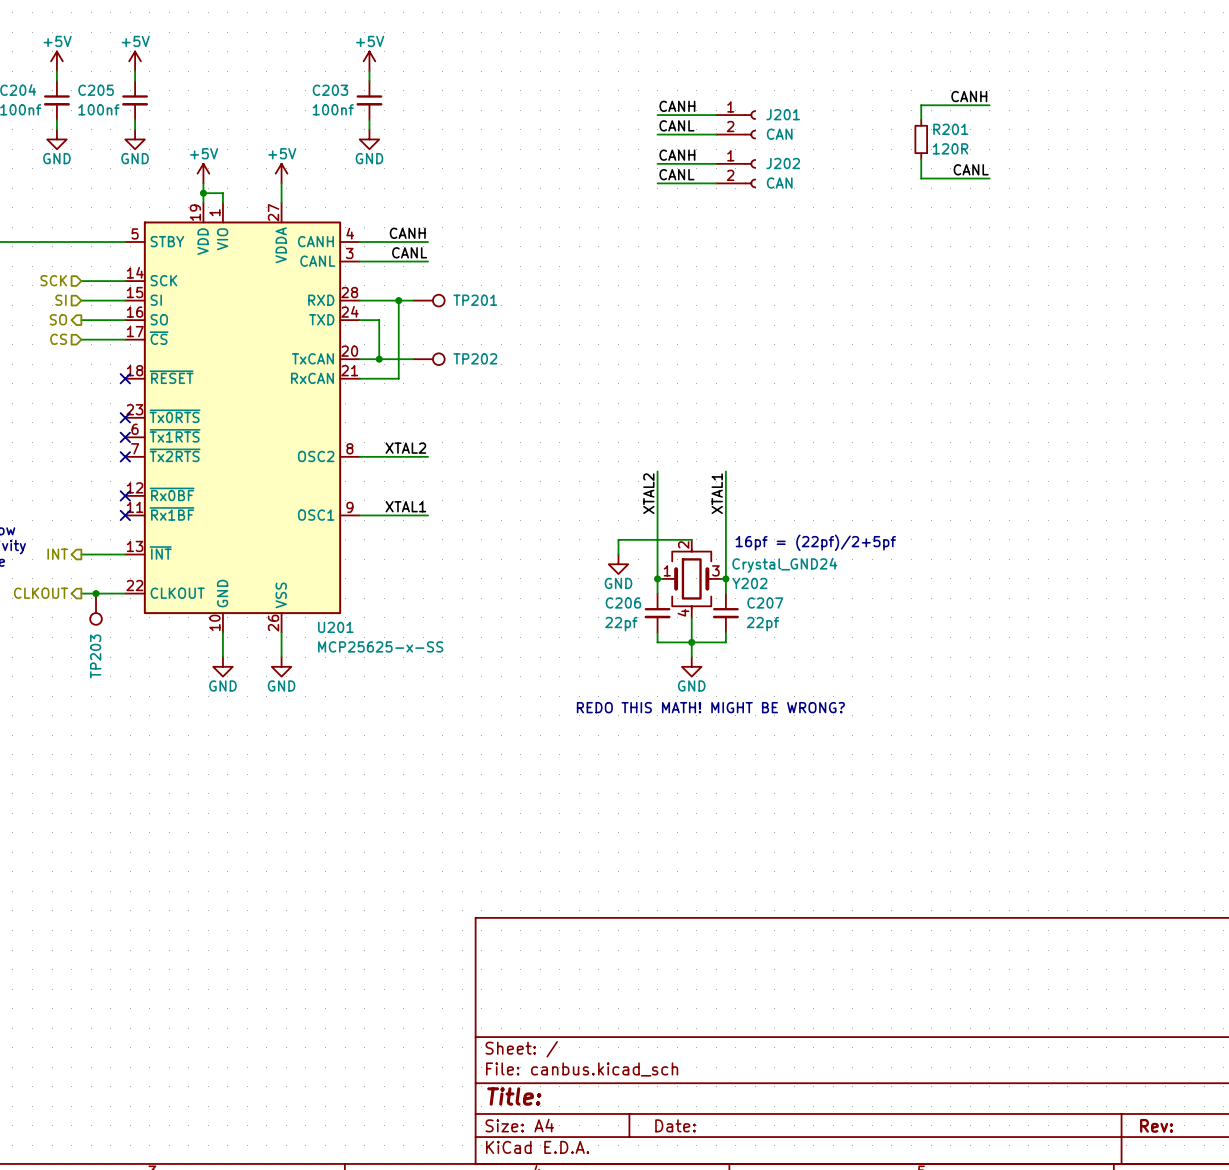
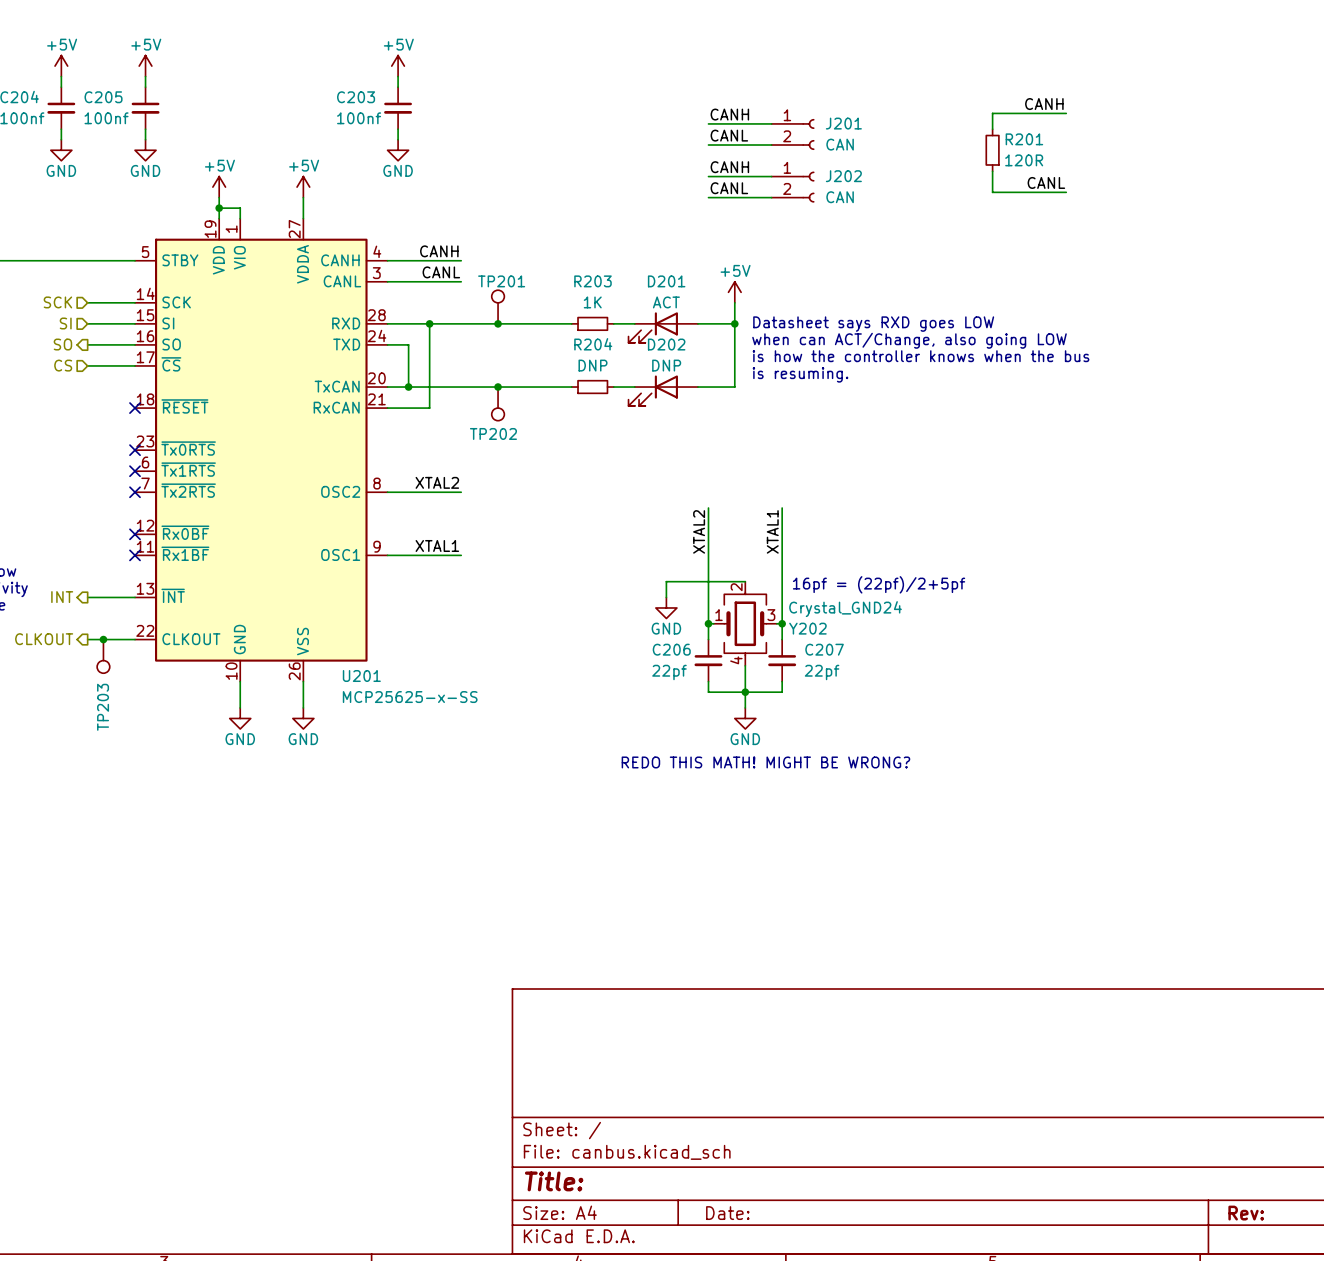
power symbol: none -> +5V (734, 292)
wire: none -> (734, 302) (734, 387) (697, 387)
wire: none -> (445, 323) (571, 323)
TP201 position: (429, 300) -> (498, 307)
TP201 rotation: 0° (438, 300) -> 90° counterclockwise (498, 296)
junction: none -> (498, 323)
TP201 name position: TP201 (475, 300) -> TP201 (501, 281)
R203: none -> 1K (592, 323)
wire: none -> (613, 323) (634, 323)
wire: none -> (697, 323) (734, 323)
junction: none -> (734, 323)
text: none -> Datasheet says RXD goes LOW (873, 324)
D201: none -> ACT (663, 327)
text: none -> when can ACT/Change, also going LOW (909, 340)
text: none -> is how the controller knows when the bus (921, 356)
text: none -> is resuming. (800, 374)
TP202 name position: TP202 (475, 358) -> TP202 (493, 433)
wire: none -> (445, 387) (571, 387)
TP202 position: (429, 359) -> (498, 403)
TP202 rotation: 0° (438, 359) -> 90° clockwise (498, 414)
junction: none -> (498, 387)
R204: none -> DNP (592, 387)
wire: none -> (613, 387) (634, 387)
D202: none -> DNP (663, 390)

